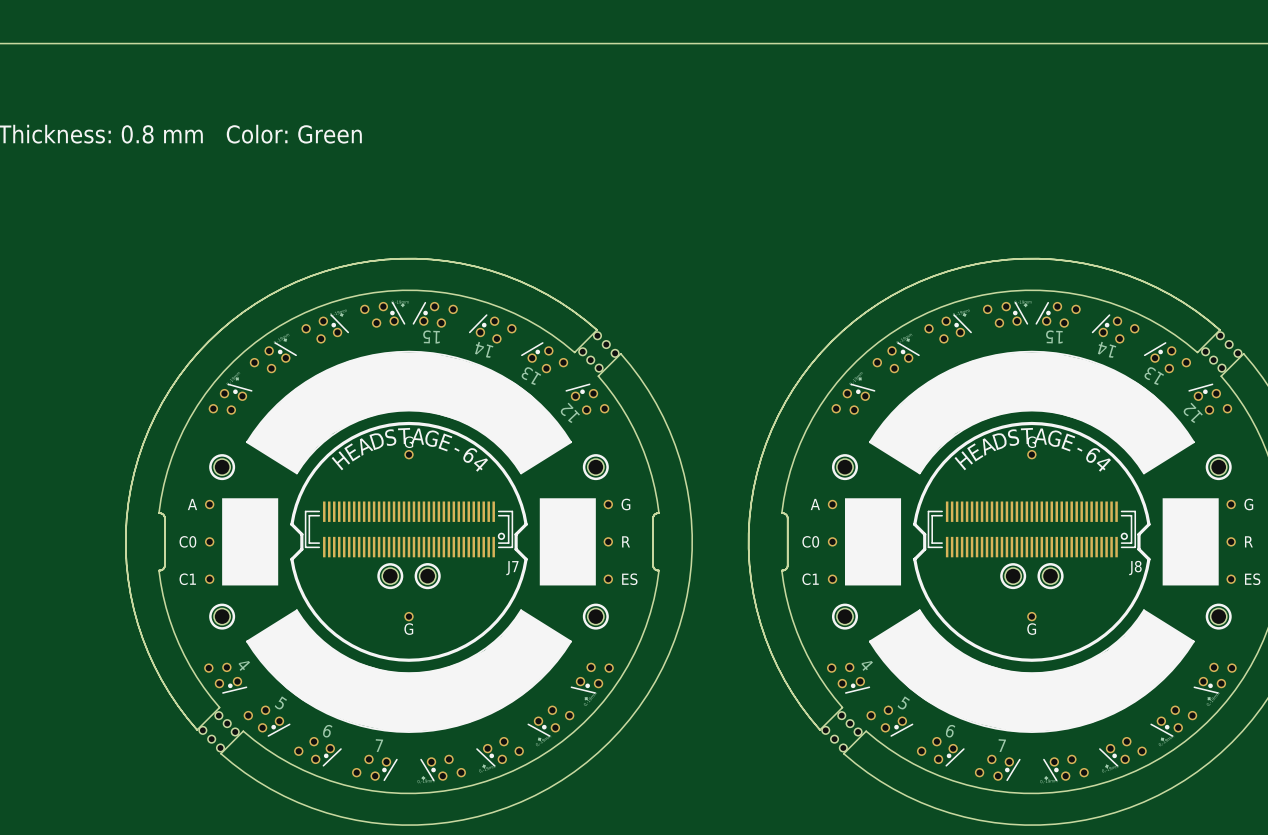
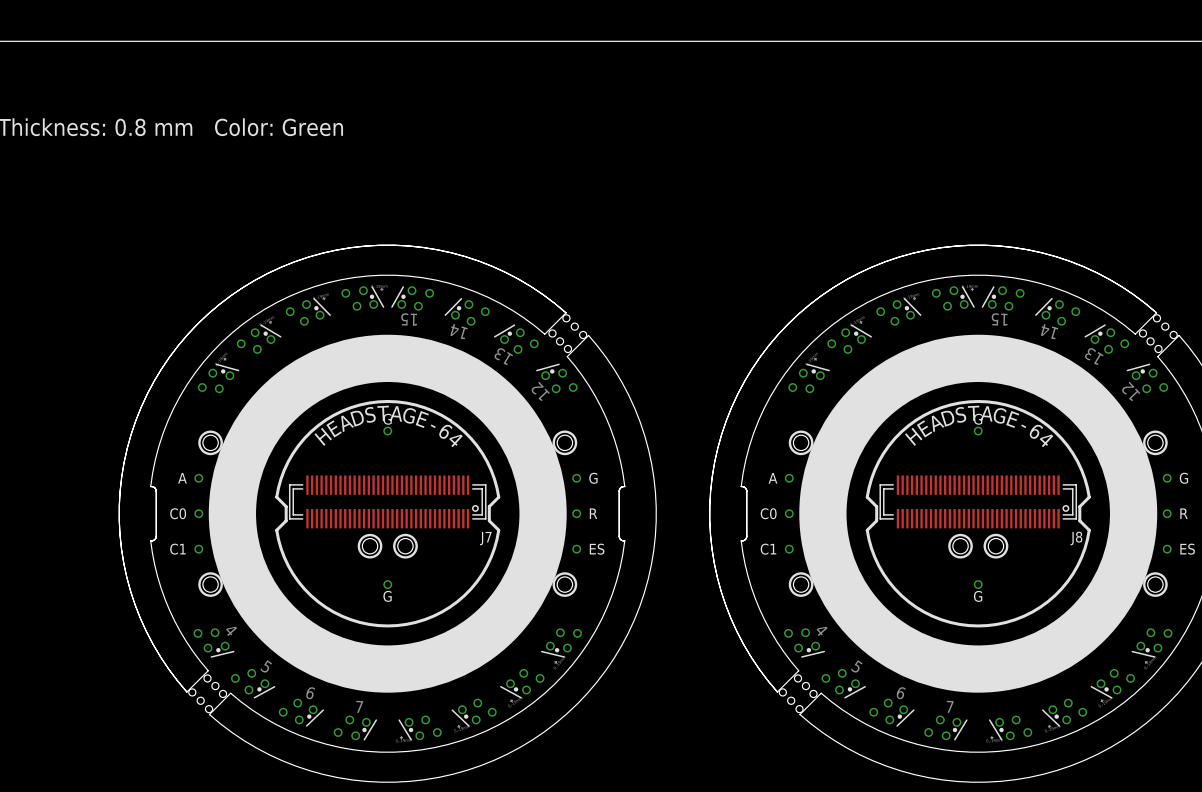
drawing: [247, 352, 571, 474] -> none
drawing: [869, 352, 1194, 474] -> none
drawing: none -> [208, 334, 567, 693]
drawing: none -> [799, 334, 1158, 693]
line: (247, 442) (296, 473) (315, 449) (331, 435) (349, 424) (378, 414) (408, 410) (439, 414) (468, 424) (486, 435) (501, 449) (521, 473) (570, 442) (556, 422) (540, 404) (522, 389) (501, 375) (479, 365) (456, 357) (433, 353) (408, 351) (384, 353) (361, 357) (338, 365) (316, 375) (295, 389) (277, 404) (261, 422) (247, 442) -> none
line: (869, 442) (919, 473) (938, 449) (954, 435) (972, 424) (1001, 414) (1031, 410) (1062, 414) (1091, 424) (1109, 435) (1124, 449) (1143, 473) (1193, 442) (1179, 422) (1163, 404) (1144, 389) (1124, 375) (1102, 365) (1079, 357) (1056, 353) (1031, 351) (1007, 353) (983, 357) (960, 365) (939, 375) (918, 389) (900, 404) (883, 422) (869, 442) -> none
drawing: [222, 498, 279, 586] -> none
drawing: [539, 498, 596, 586] -> none
drawing: [844, 498, 902, 586] -> none
drawing: [1162, 498, 1219, 586] -> none
drawing: [247, 610, 571, 732] -> none
line: (296, 610) (247, 641) (253, 651) (268, 670) (286, 687) (316, 707) (349, 722) (384, 730) (421, 731) (445, 728) (468, 722) (490, 713) (512, 701) (531, 687) (556, 661) (570, 641) (521, 610) (501, 634) (486, 648) (468, 658) (439, 669) (419, 672) (398, 672) (368, 666) (340, 653) (315, 634) (296, 610) -> none
drawing: [869, 610, 1194, 732] -> none
line: (919, 610) (869, 641) (876, 651) (891, 670) (909, 687) (939, 707) (972, 722) (1007, 730) (1043, 731) (1067, 728) (1091, 722) (1113, 713) (1134, 701) (1154, 687) (1179, 661) (1193, 641) (1143, 610) (1124, 634) (1109, 648) (1091, 658) (1062, 669) (1042, 672) (1021, 672) (991, 666) (963, 653) (938, 634) (919, 610) -> none

